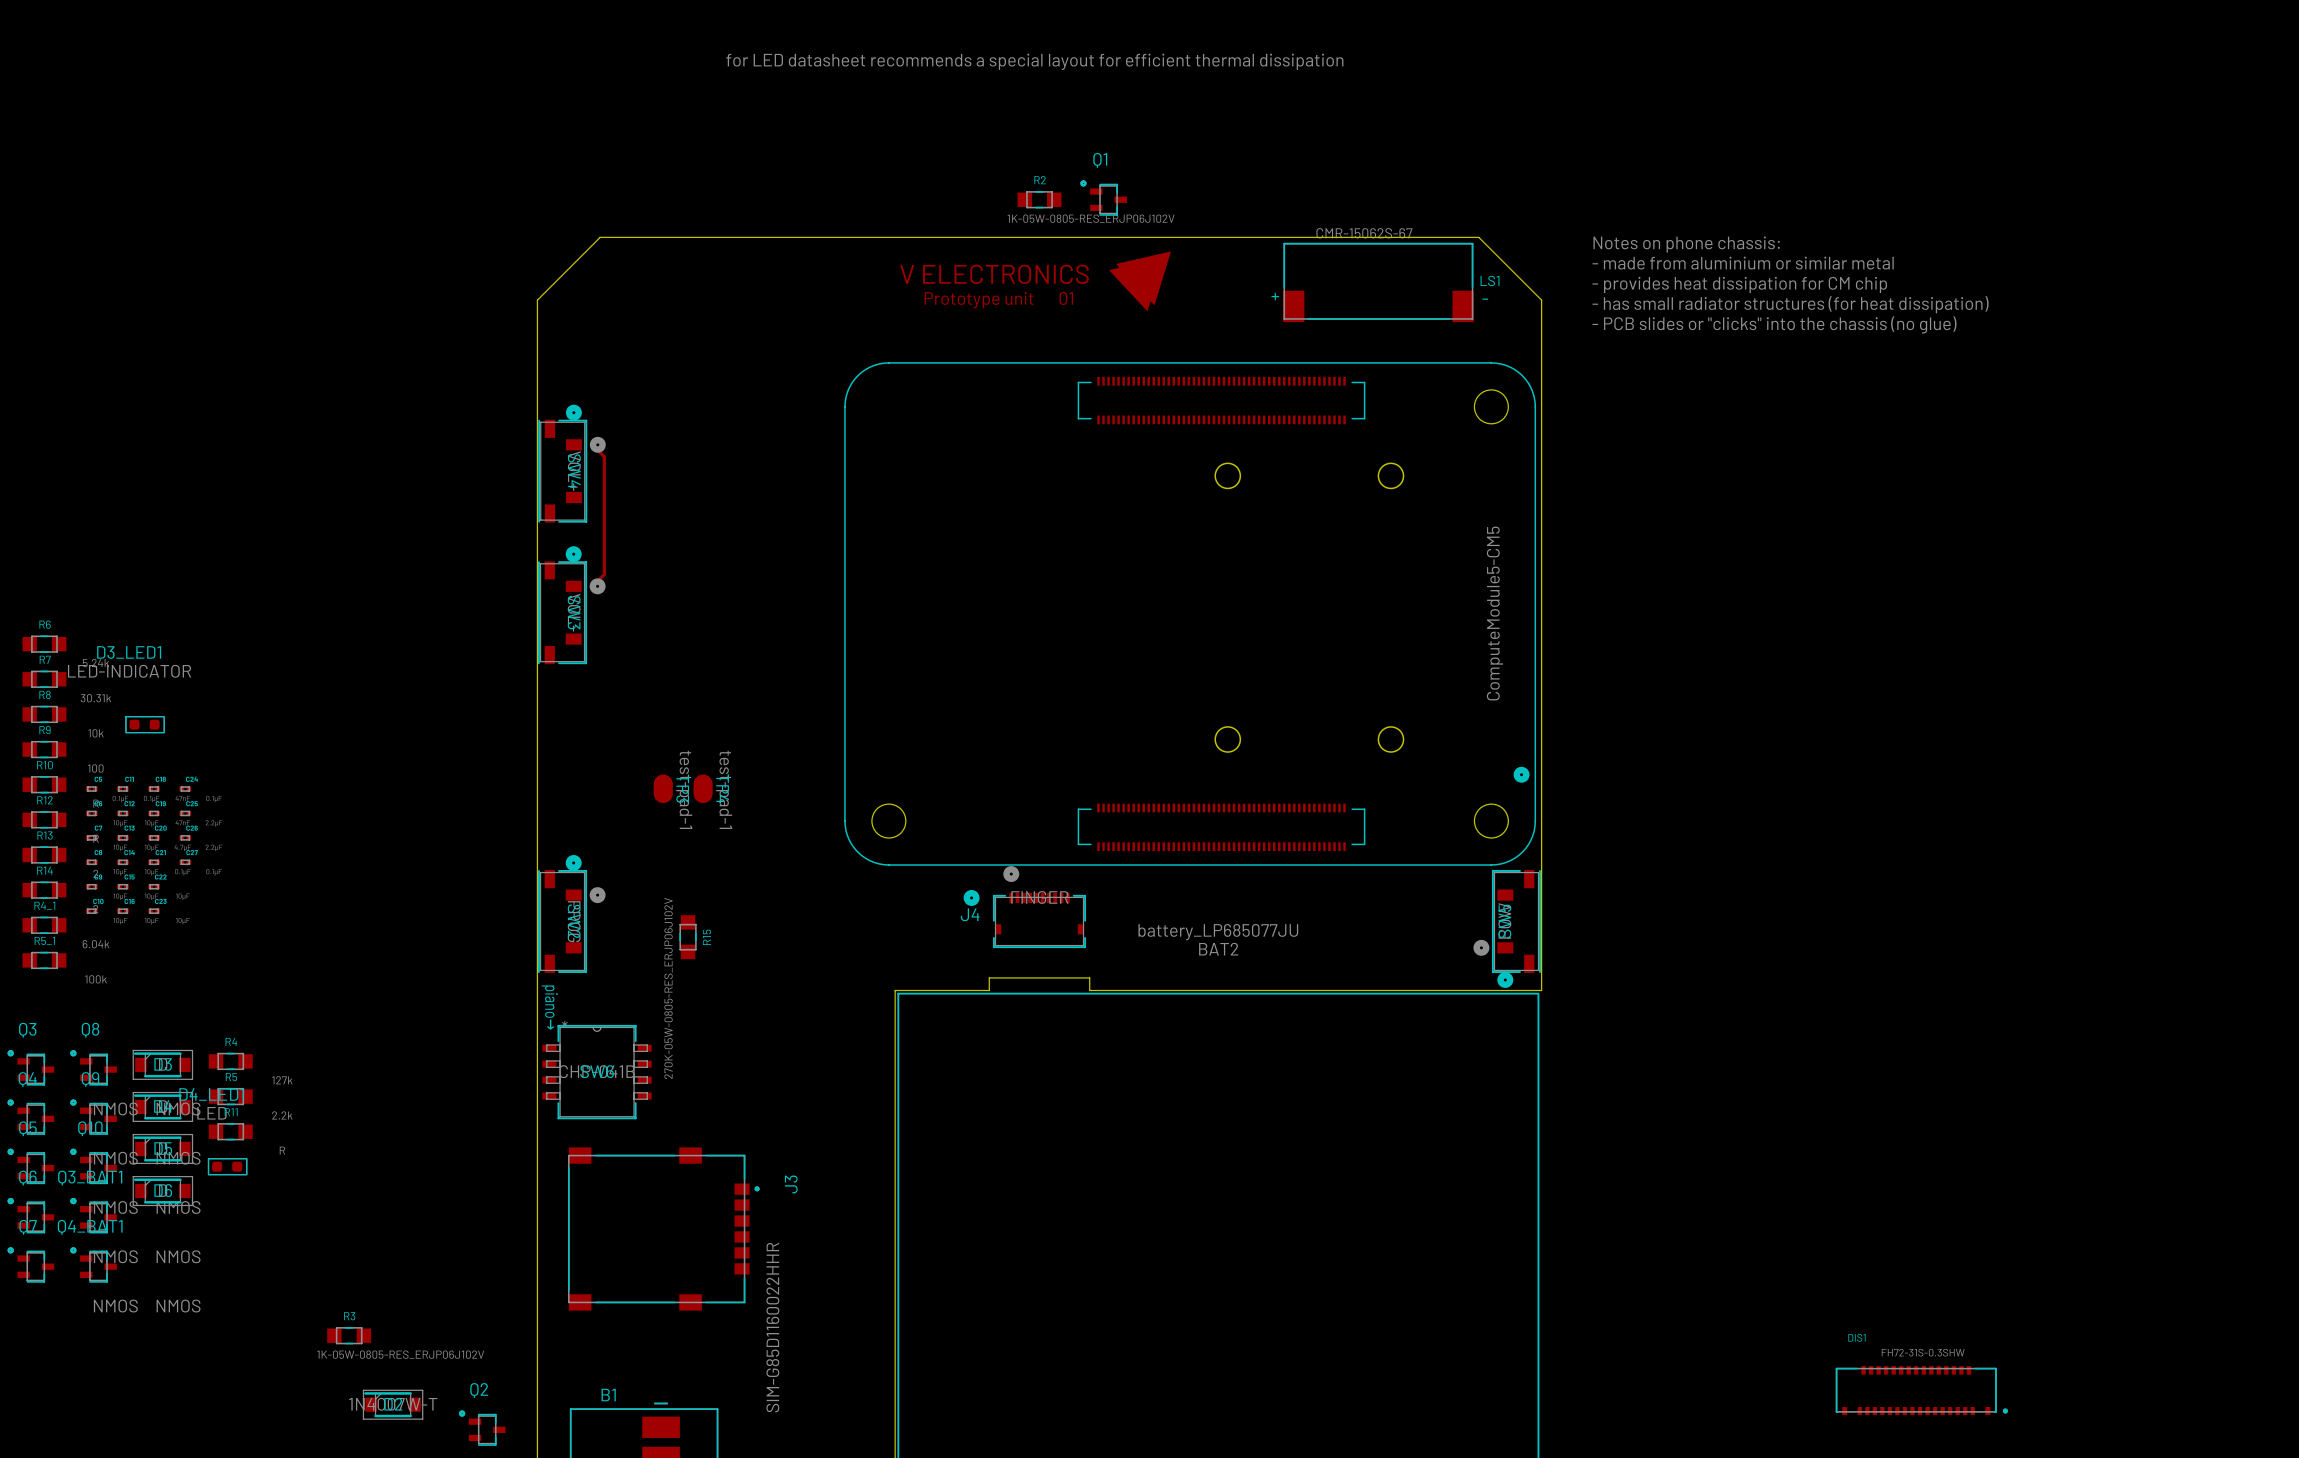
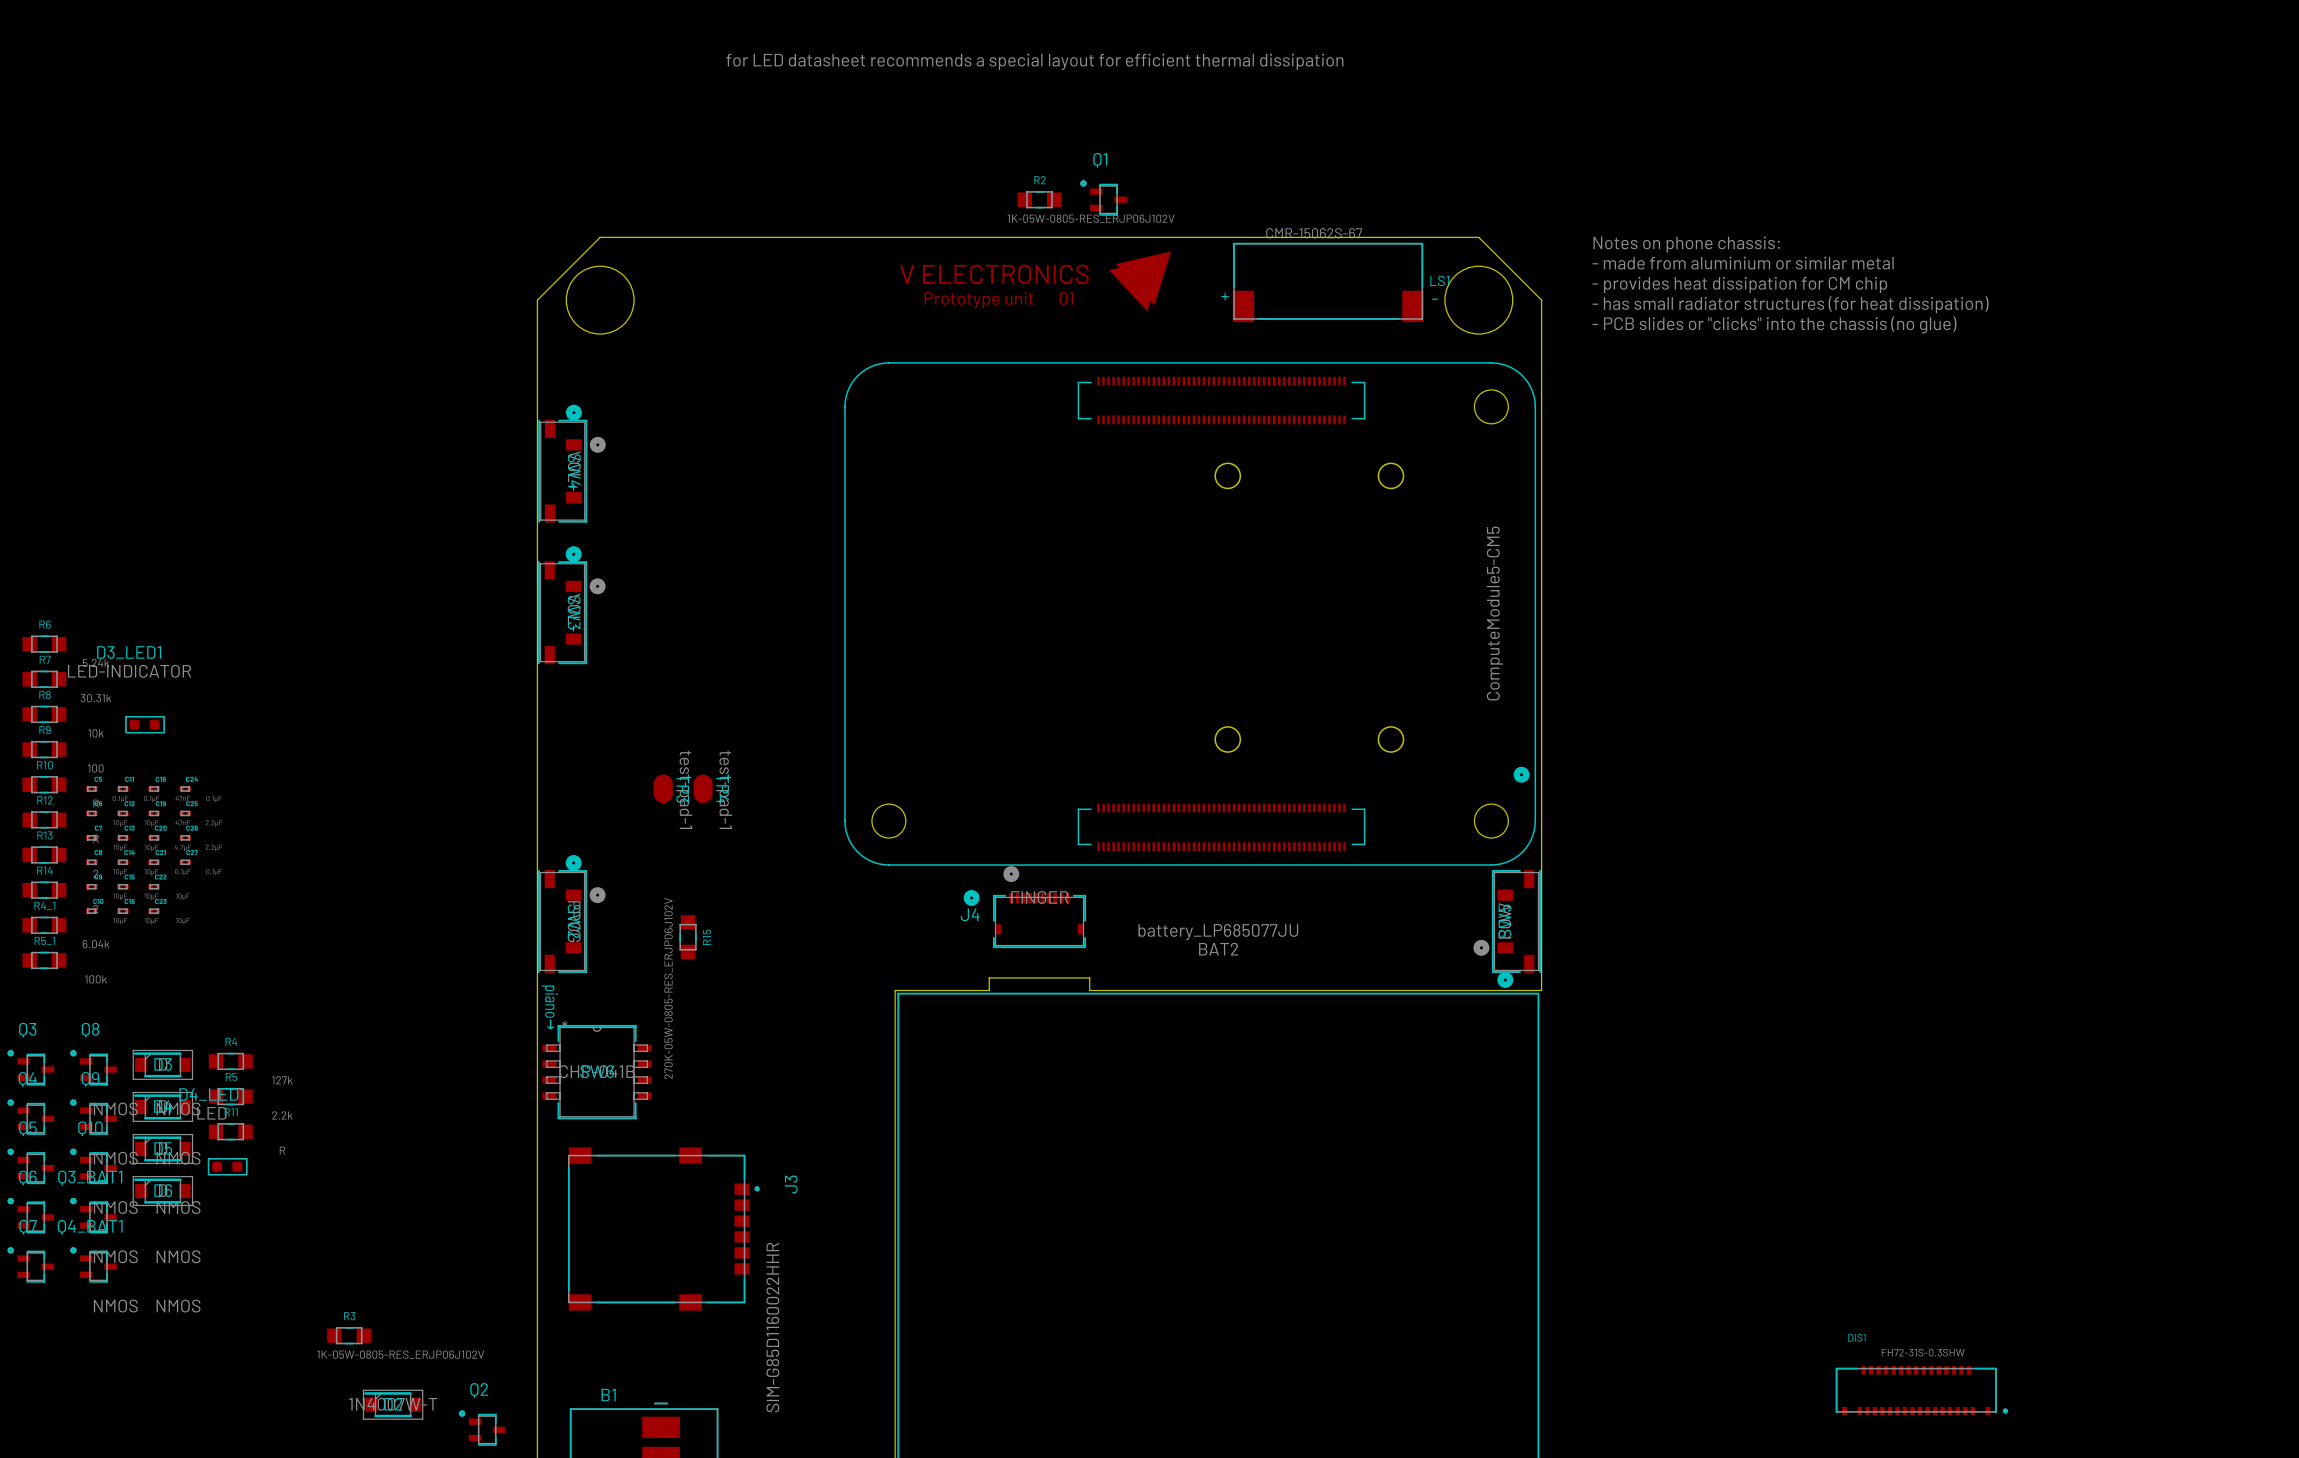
round board edge: none -> [565, 265, 635, 335]
round board edge: none -> [1444, 265, 1514, 335]
LS1 position: (1378, 282) -> (1328, 282)
track: (592, 444) (604, 456) (604, 574) (592, 586) -> none

